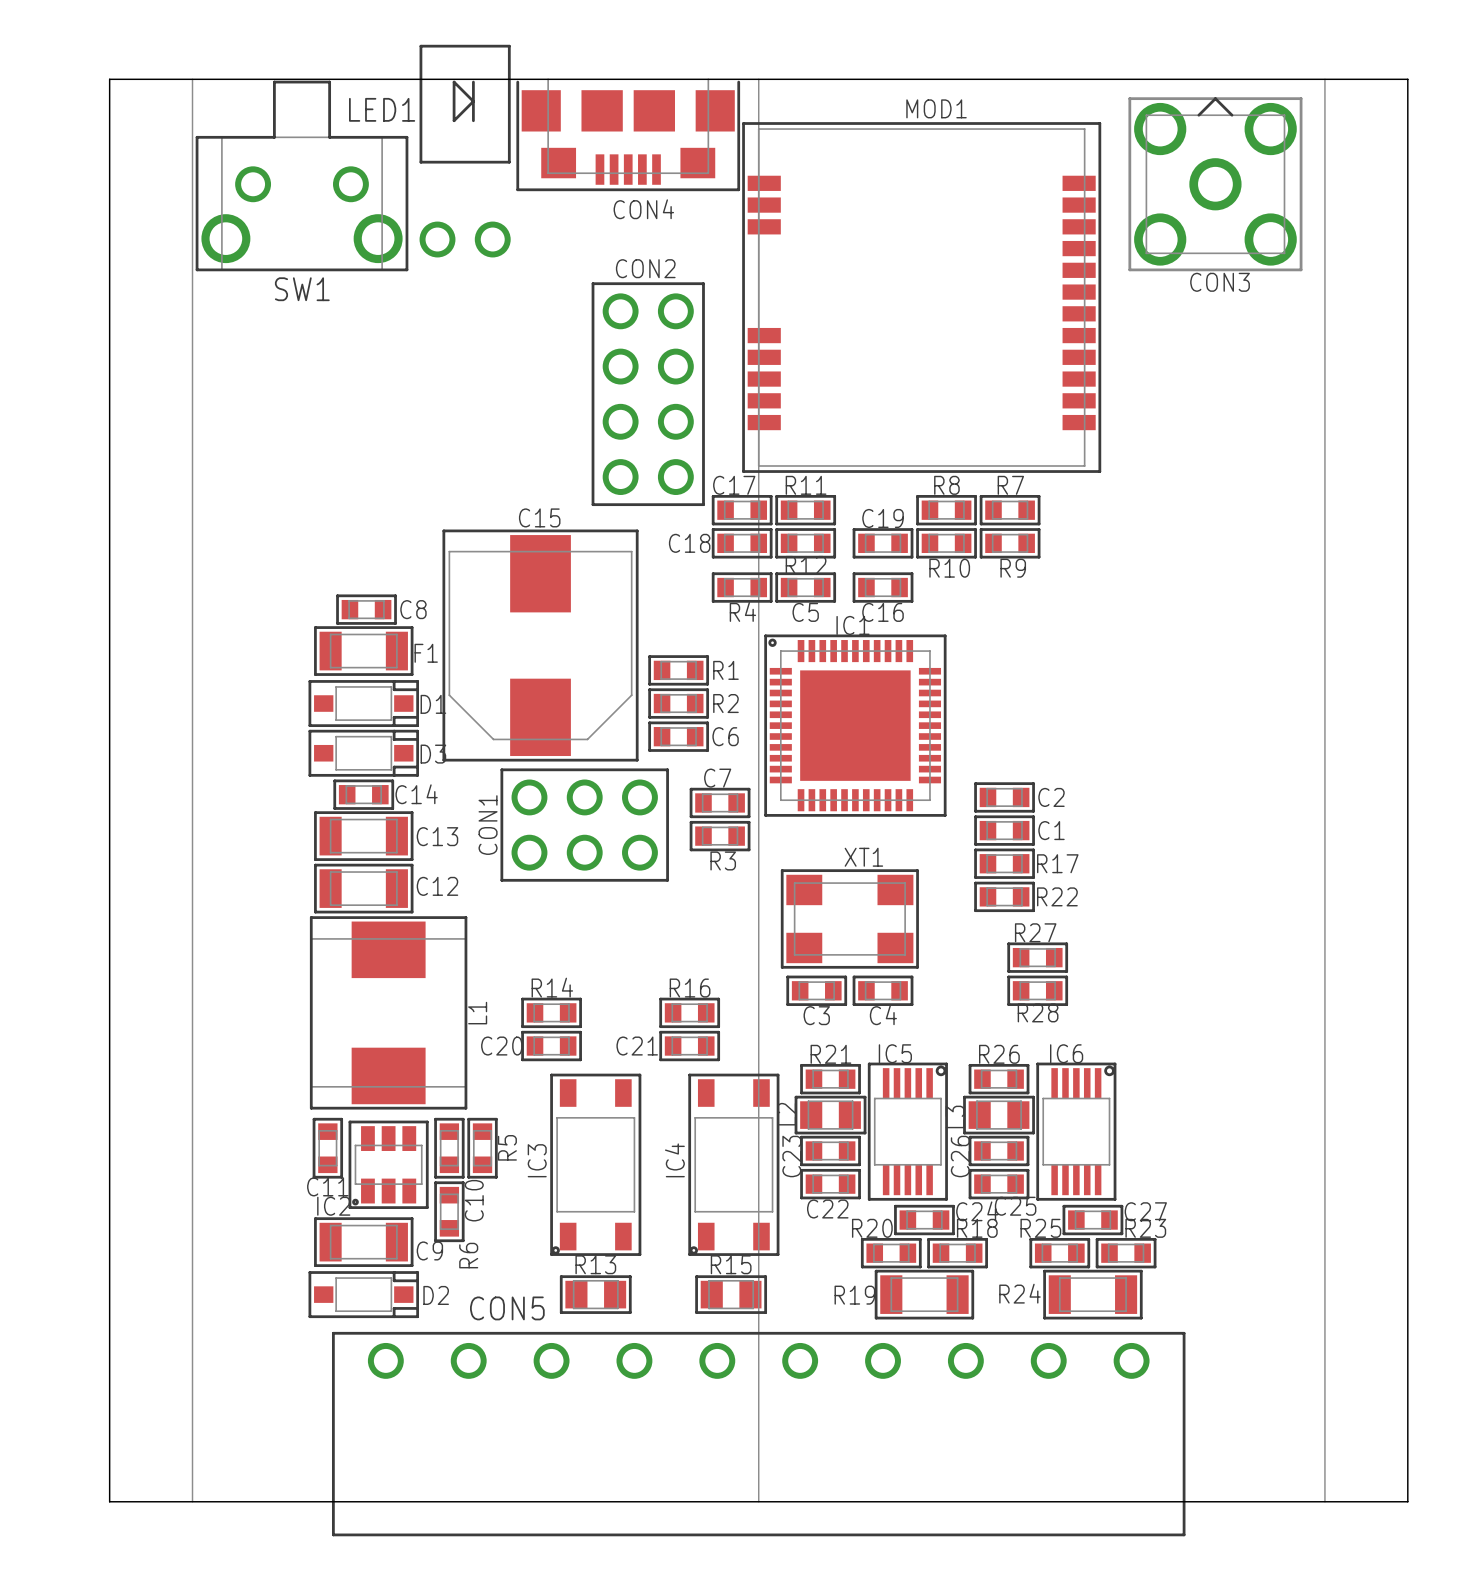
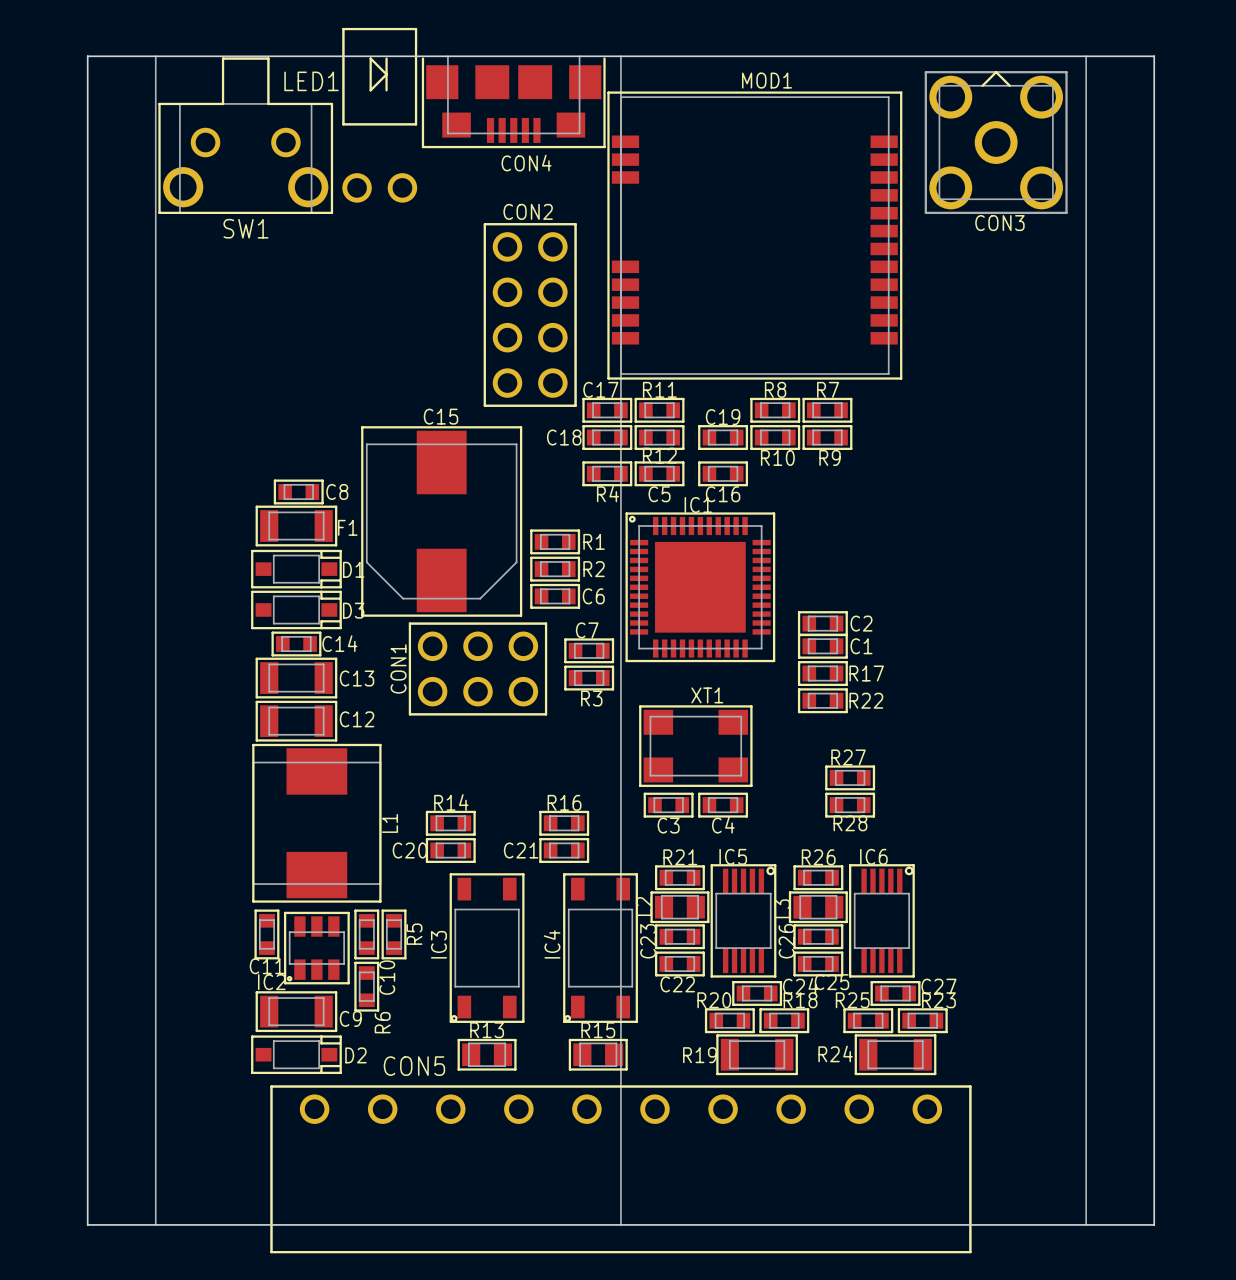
C2: none -> (822, 623)
C2 name: C2 (1051, 797) -> C1 (861, 646)
C1 name: C1 (1051, 830) -> R17 (866, 673)
R17 name: R17 (1057, 863) -> R22 (866, 700)
R22: (1004, 896) -> none

